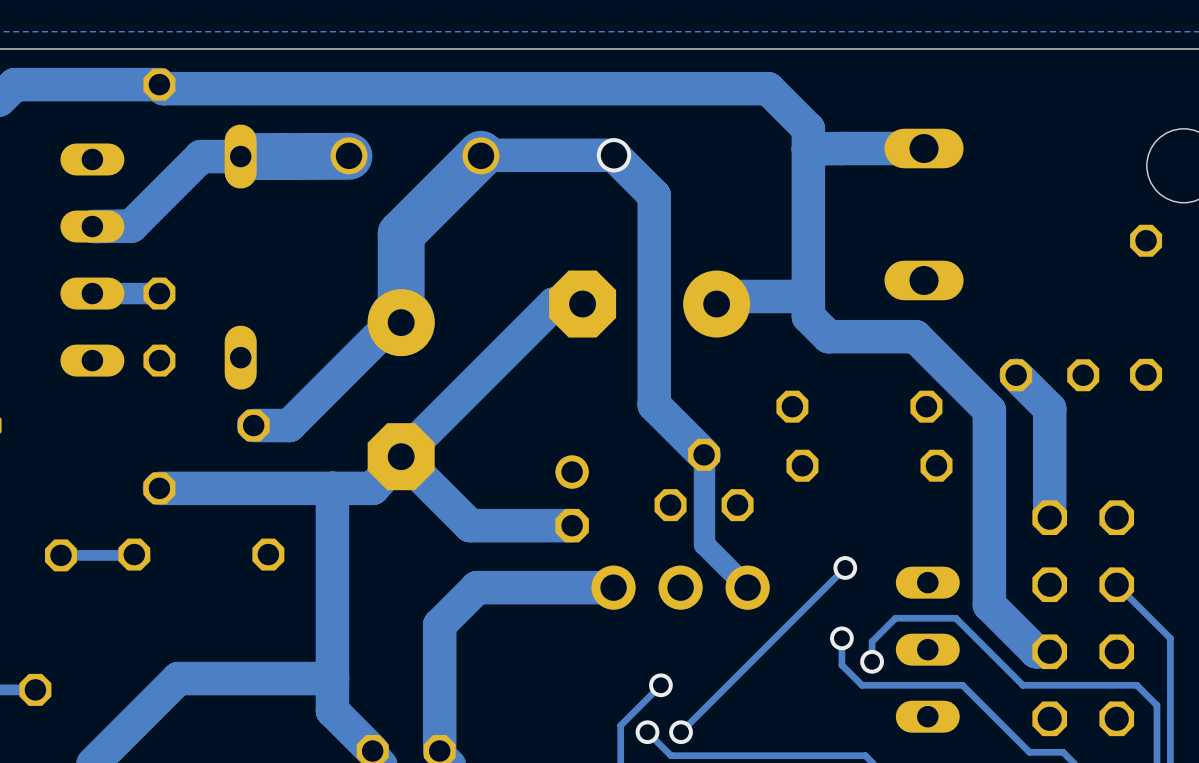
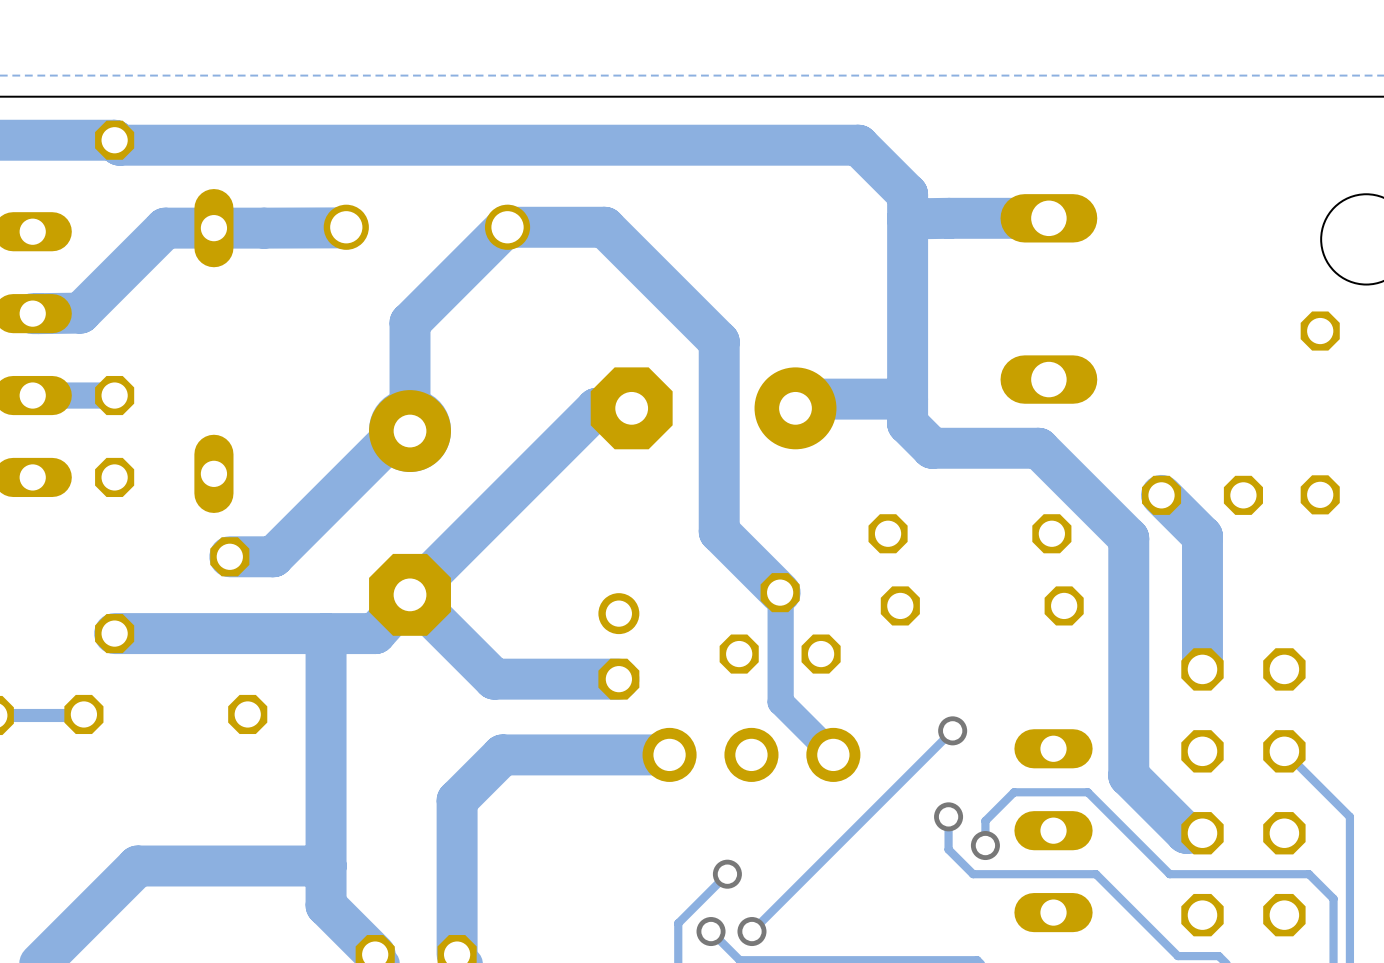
track width: thick (480, 154) (401, 234) (401, 321) -> thin (507, 225) (410, 322) (410, 429)
track: (480, 155) (614, 155) (654, 195) (654, 249) -> (507, 227) (604, 227) (719, 341)
via: (614, 155) -> none
track width: thick (349, 156) (240, 156) -> thin (346, 227) (213, 228)

